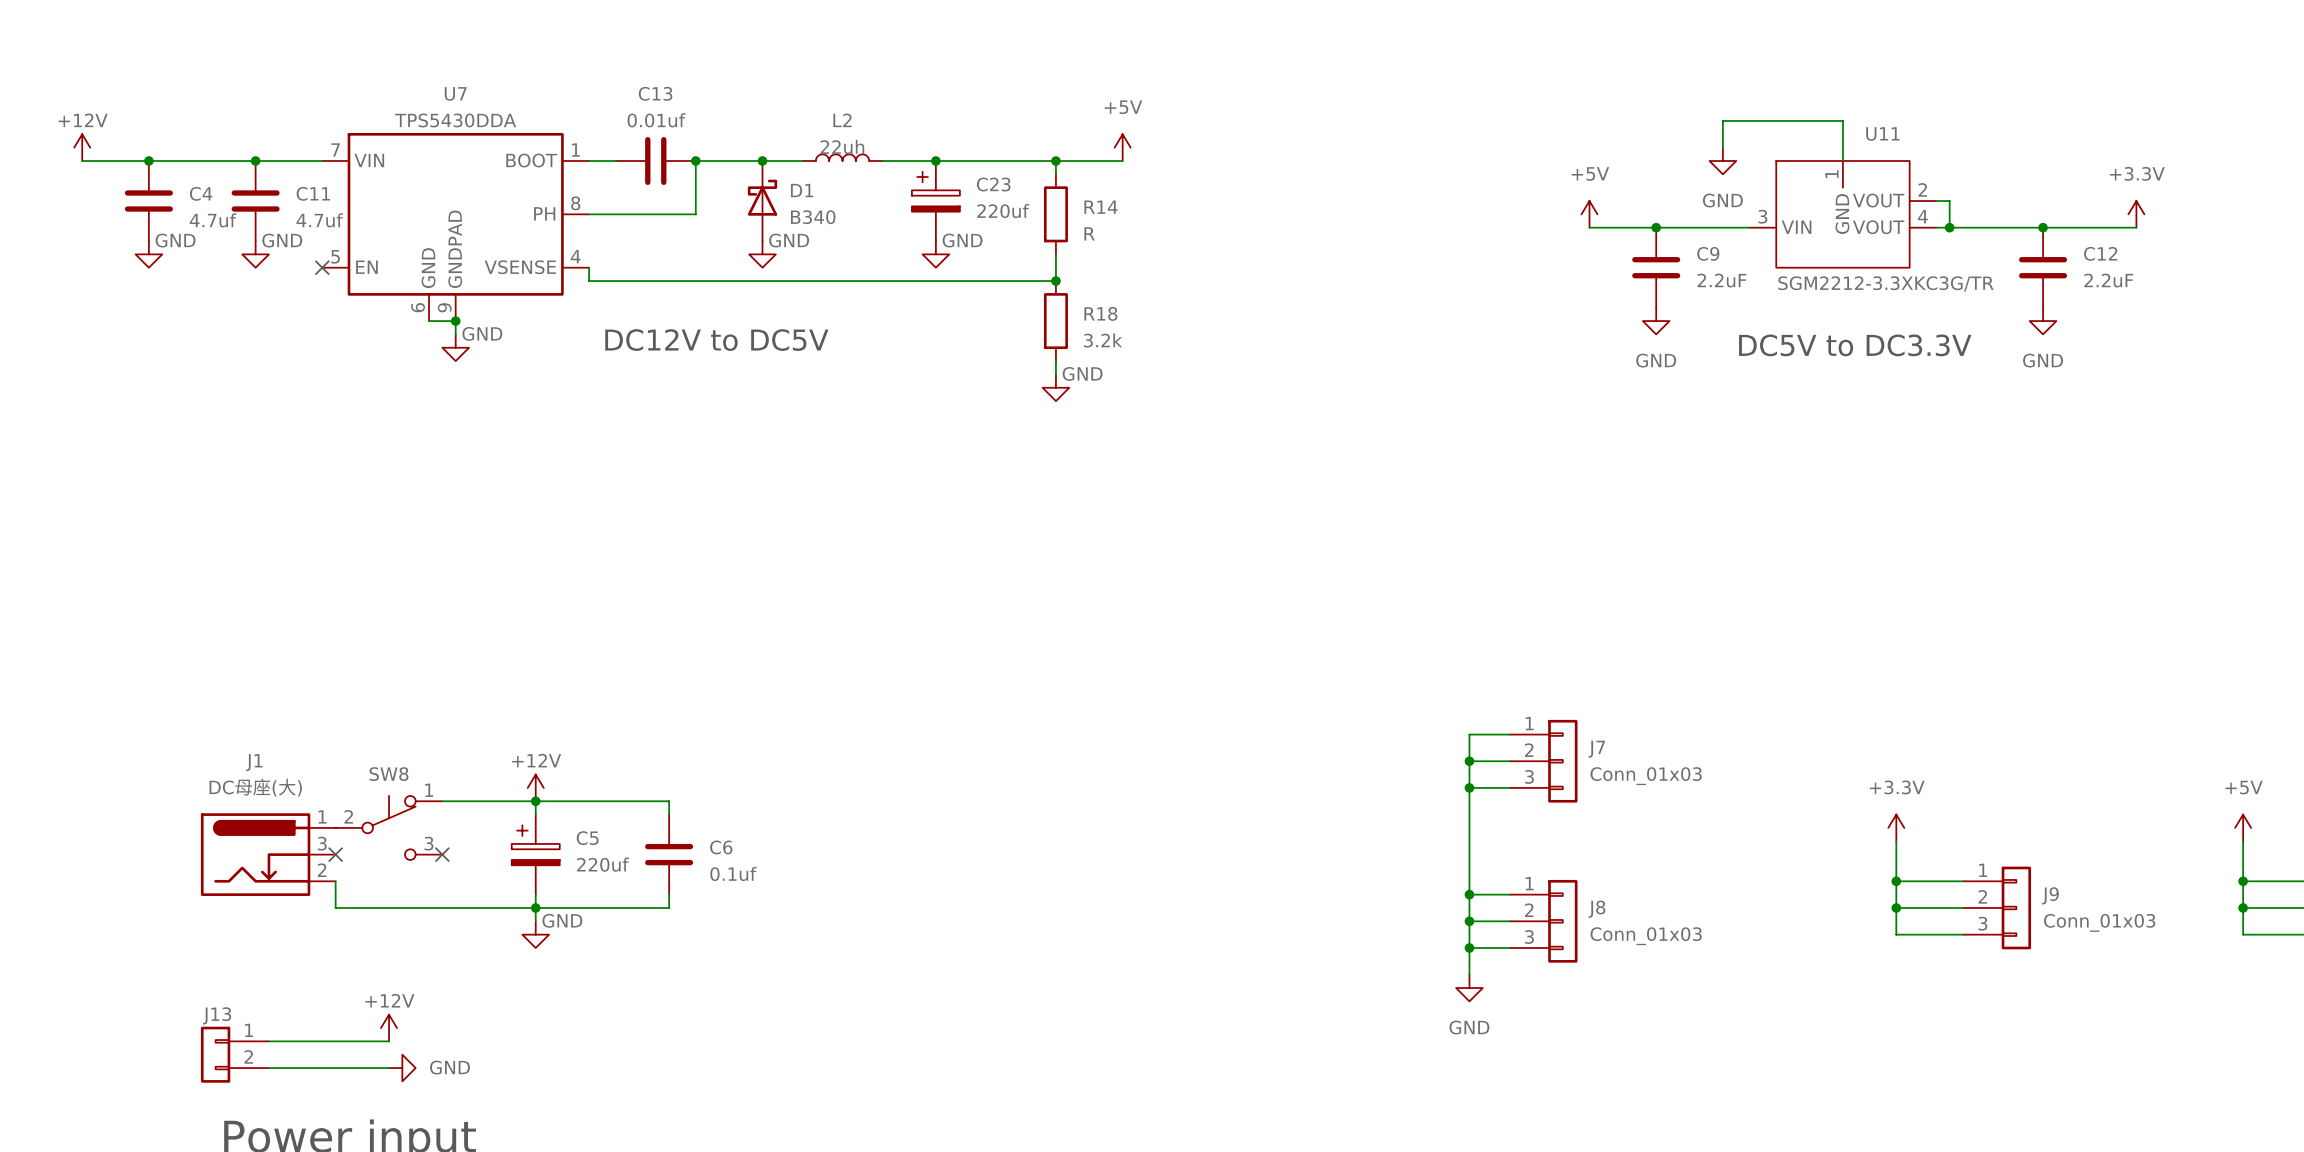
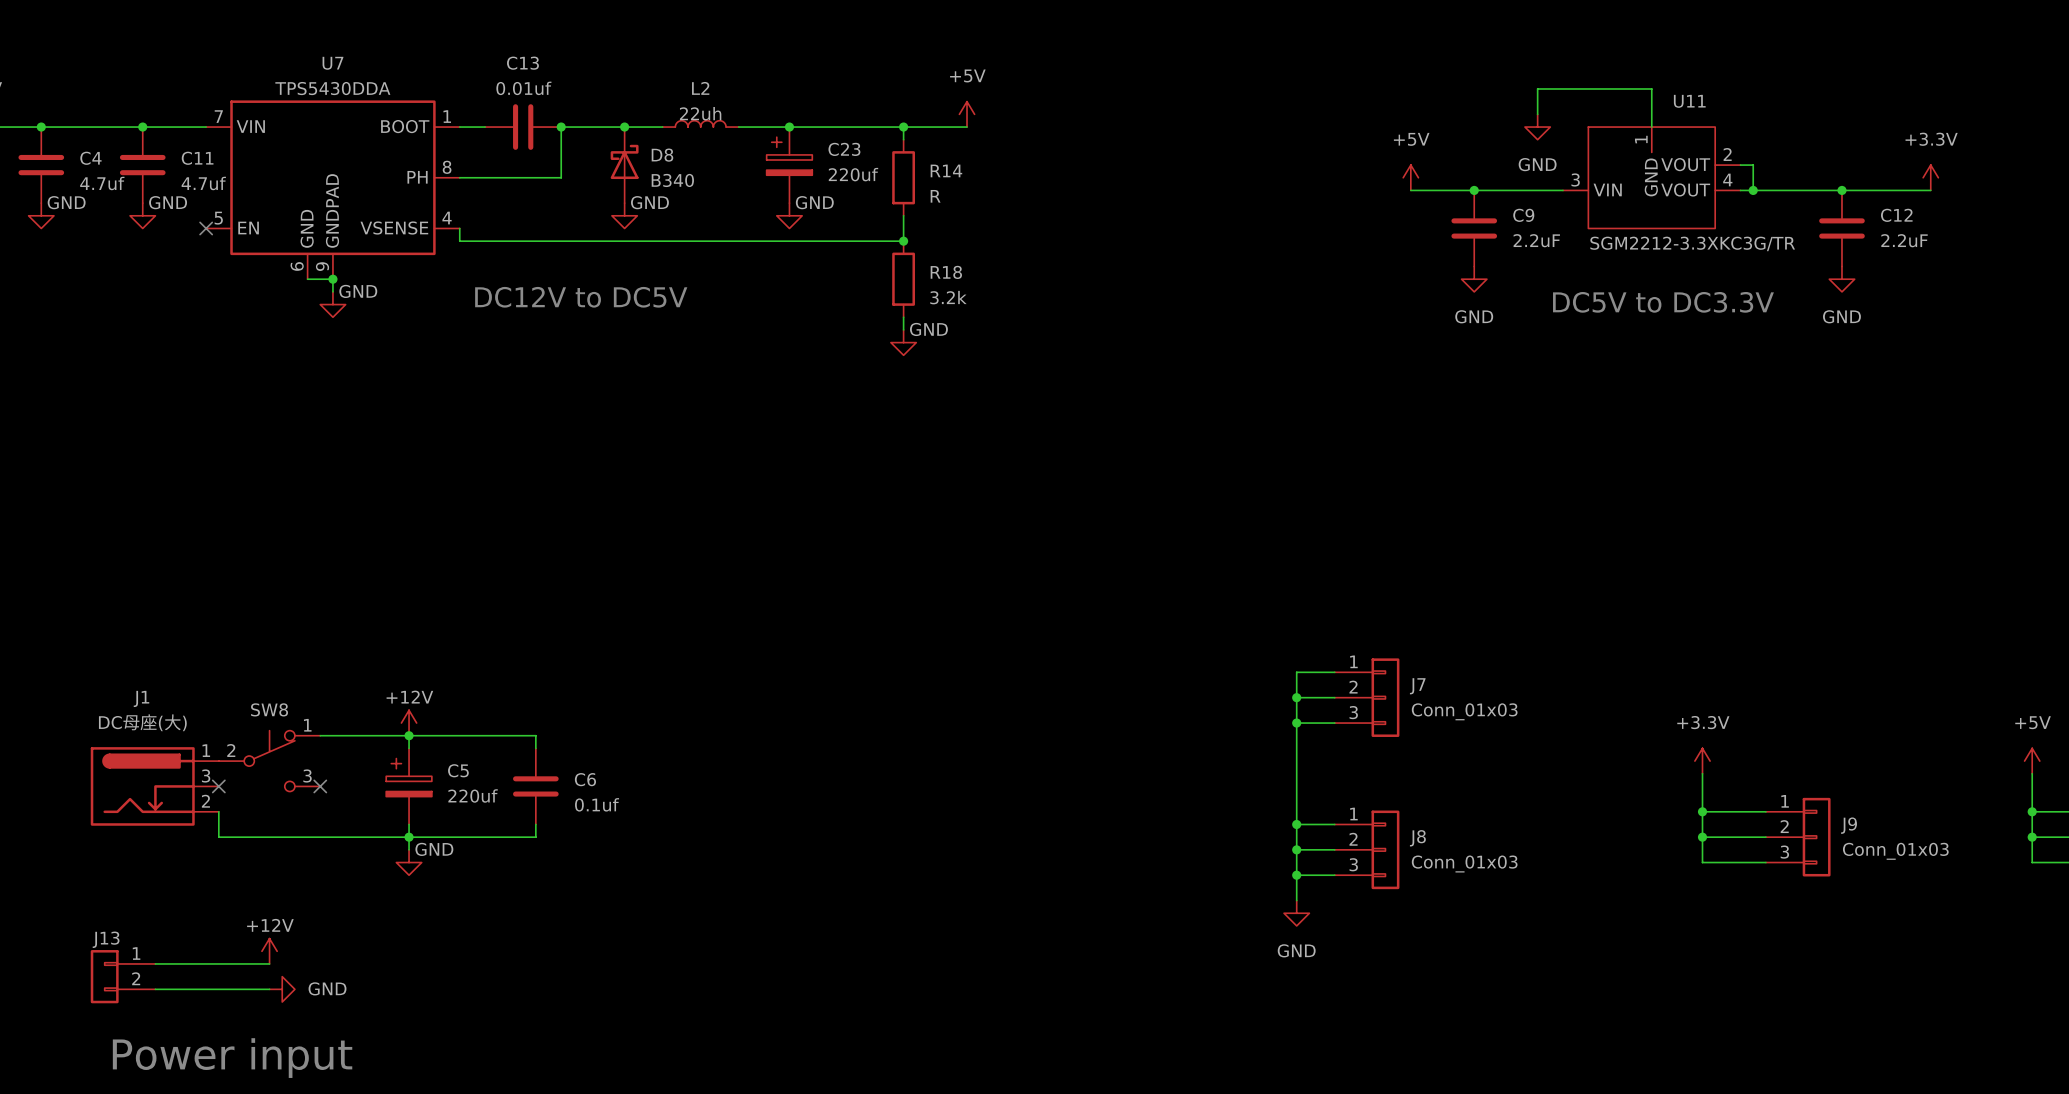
D1 name: D1 (802, 190) -> D8 (662, 155)

